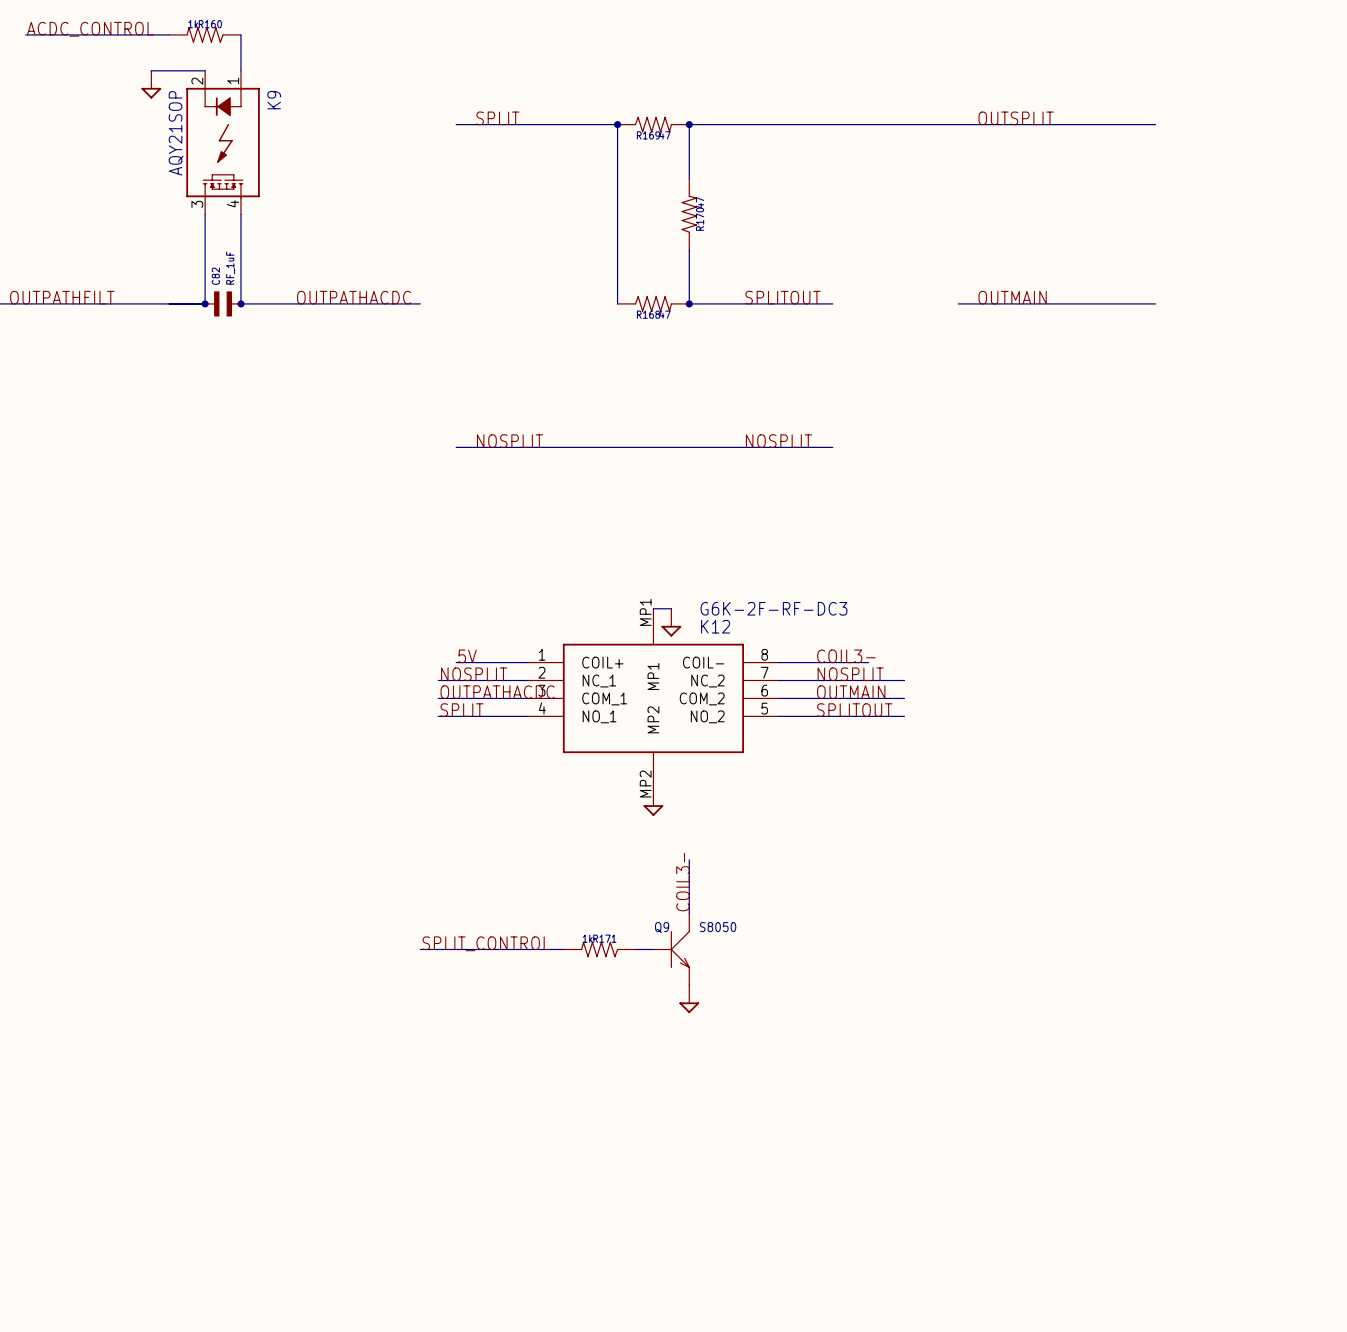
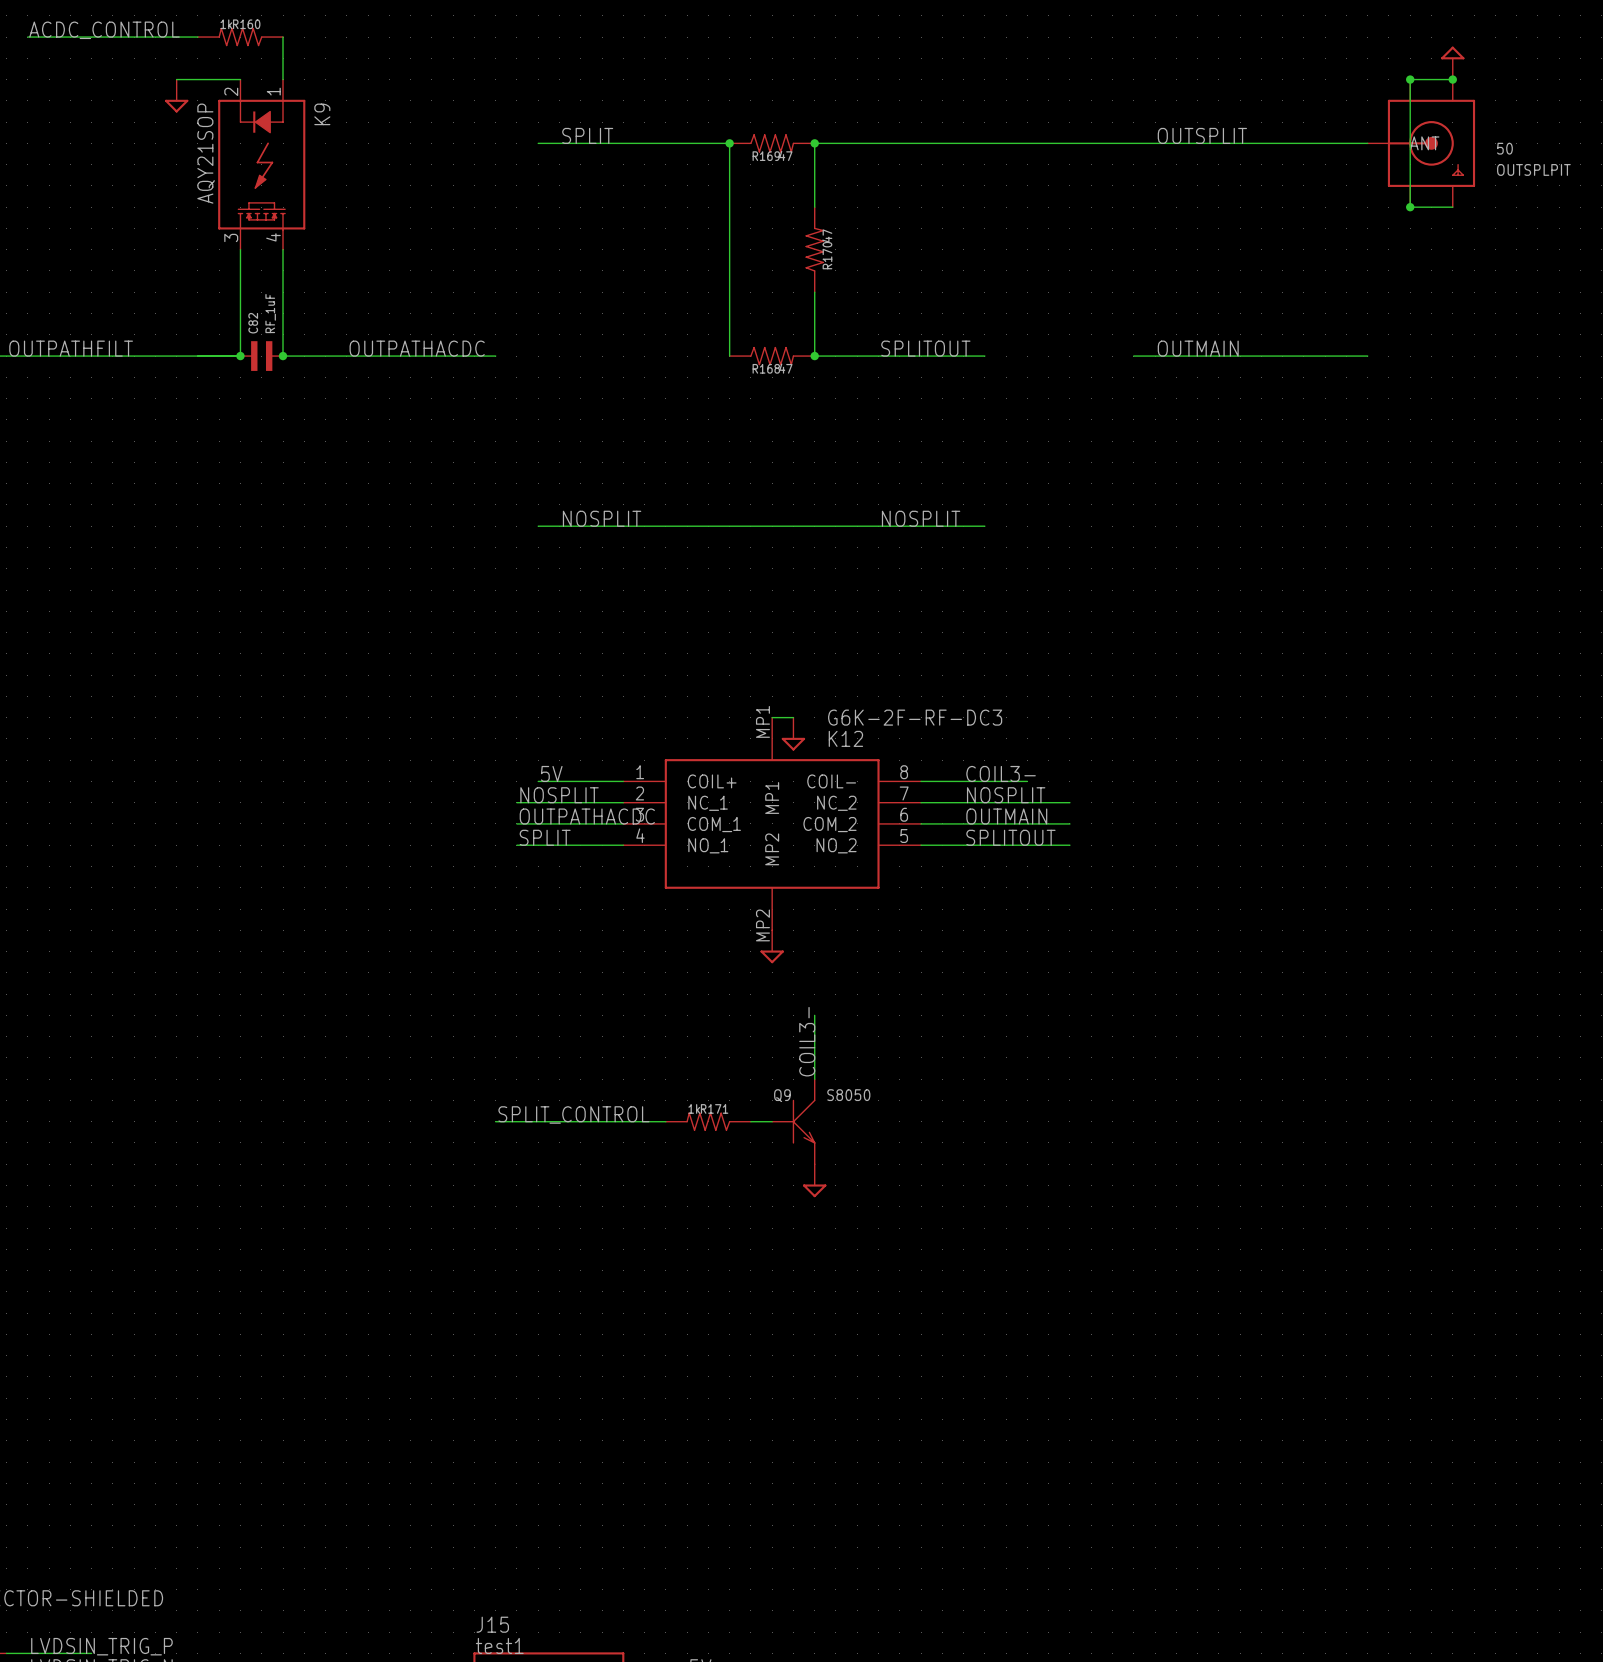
power symbol: none -> (1452, 63)
junction: none -> (1410, 79)
wire: none -> (1452, 79) (1410, 79) (1410, 207) (1452, 207)
junction: none -> (1452, 79)
OUTSPLPIT: none -> 50 (1421, 143)
junction: none -> (1410, 207)

